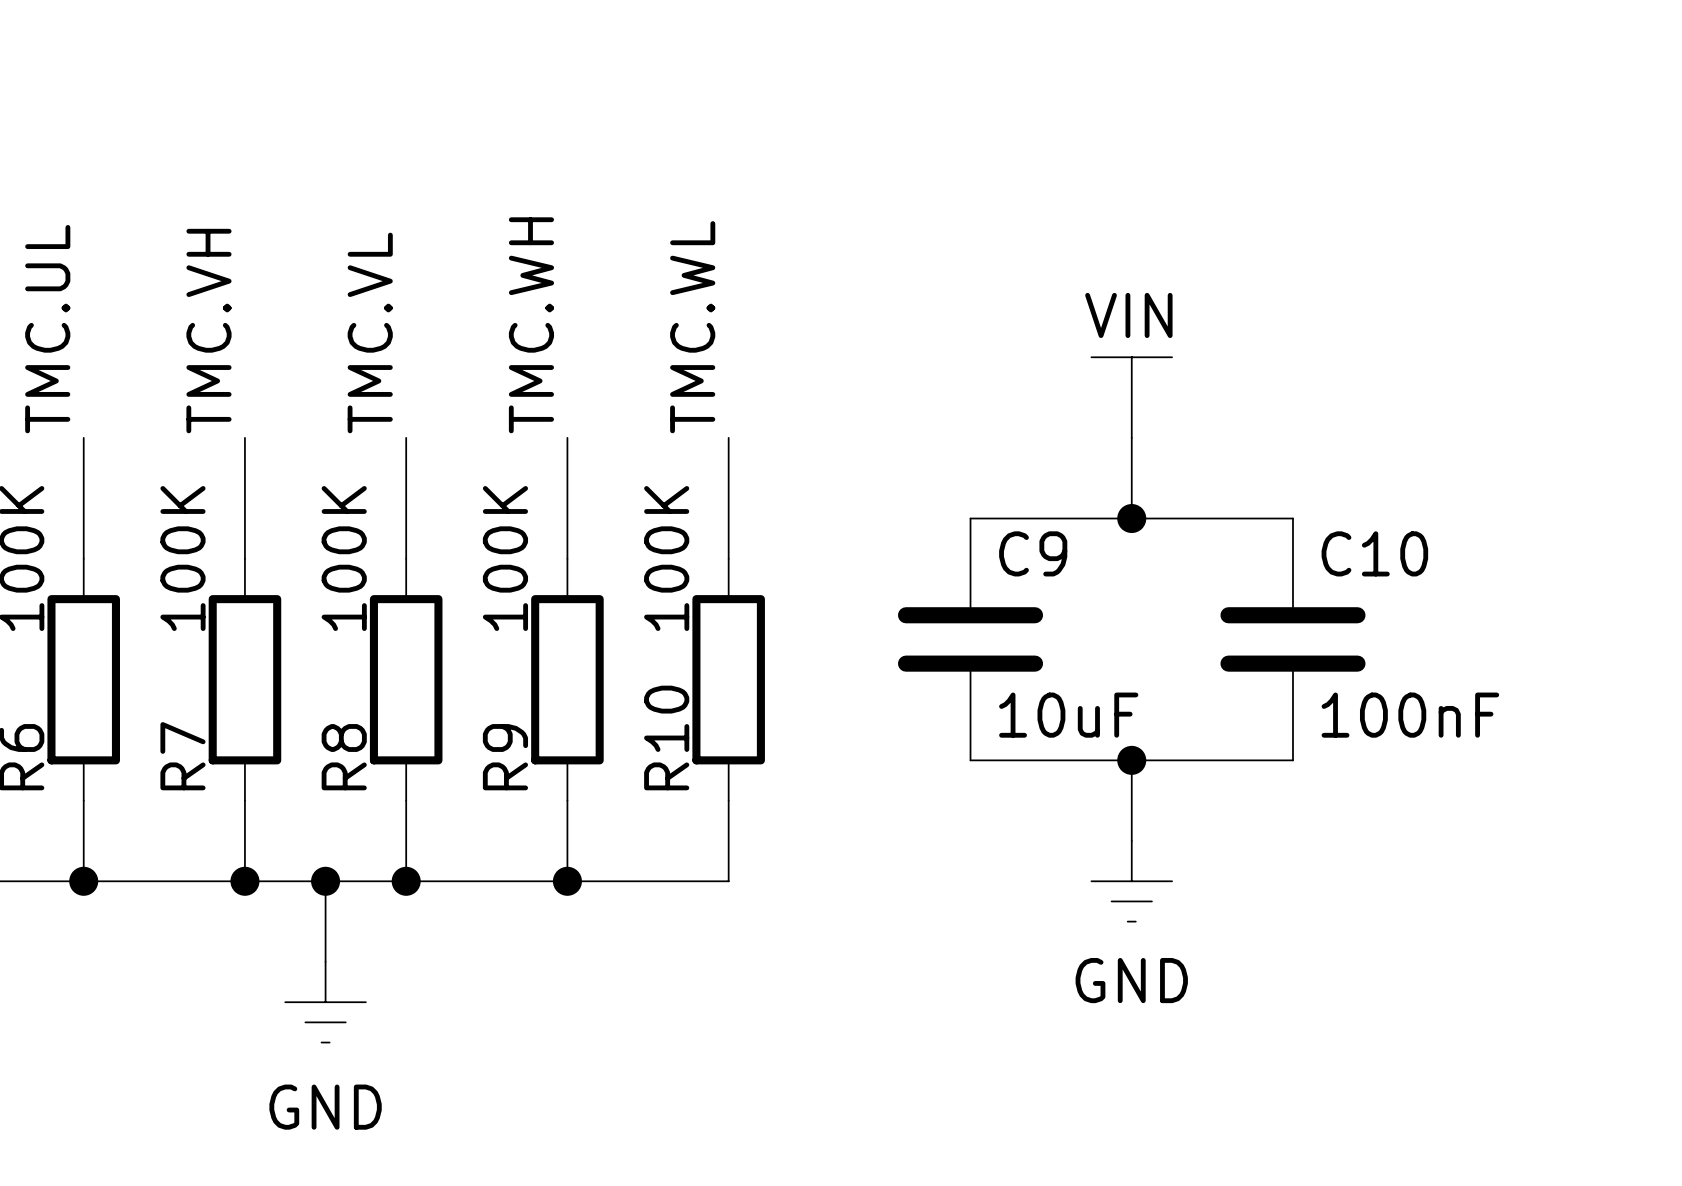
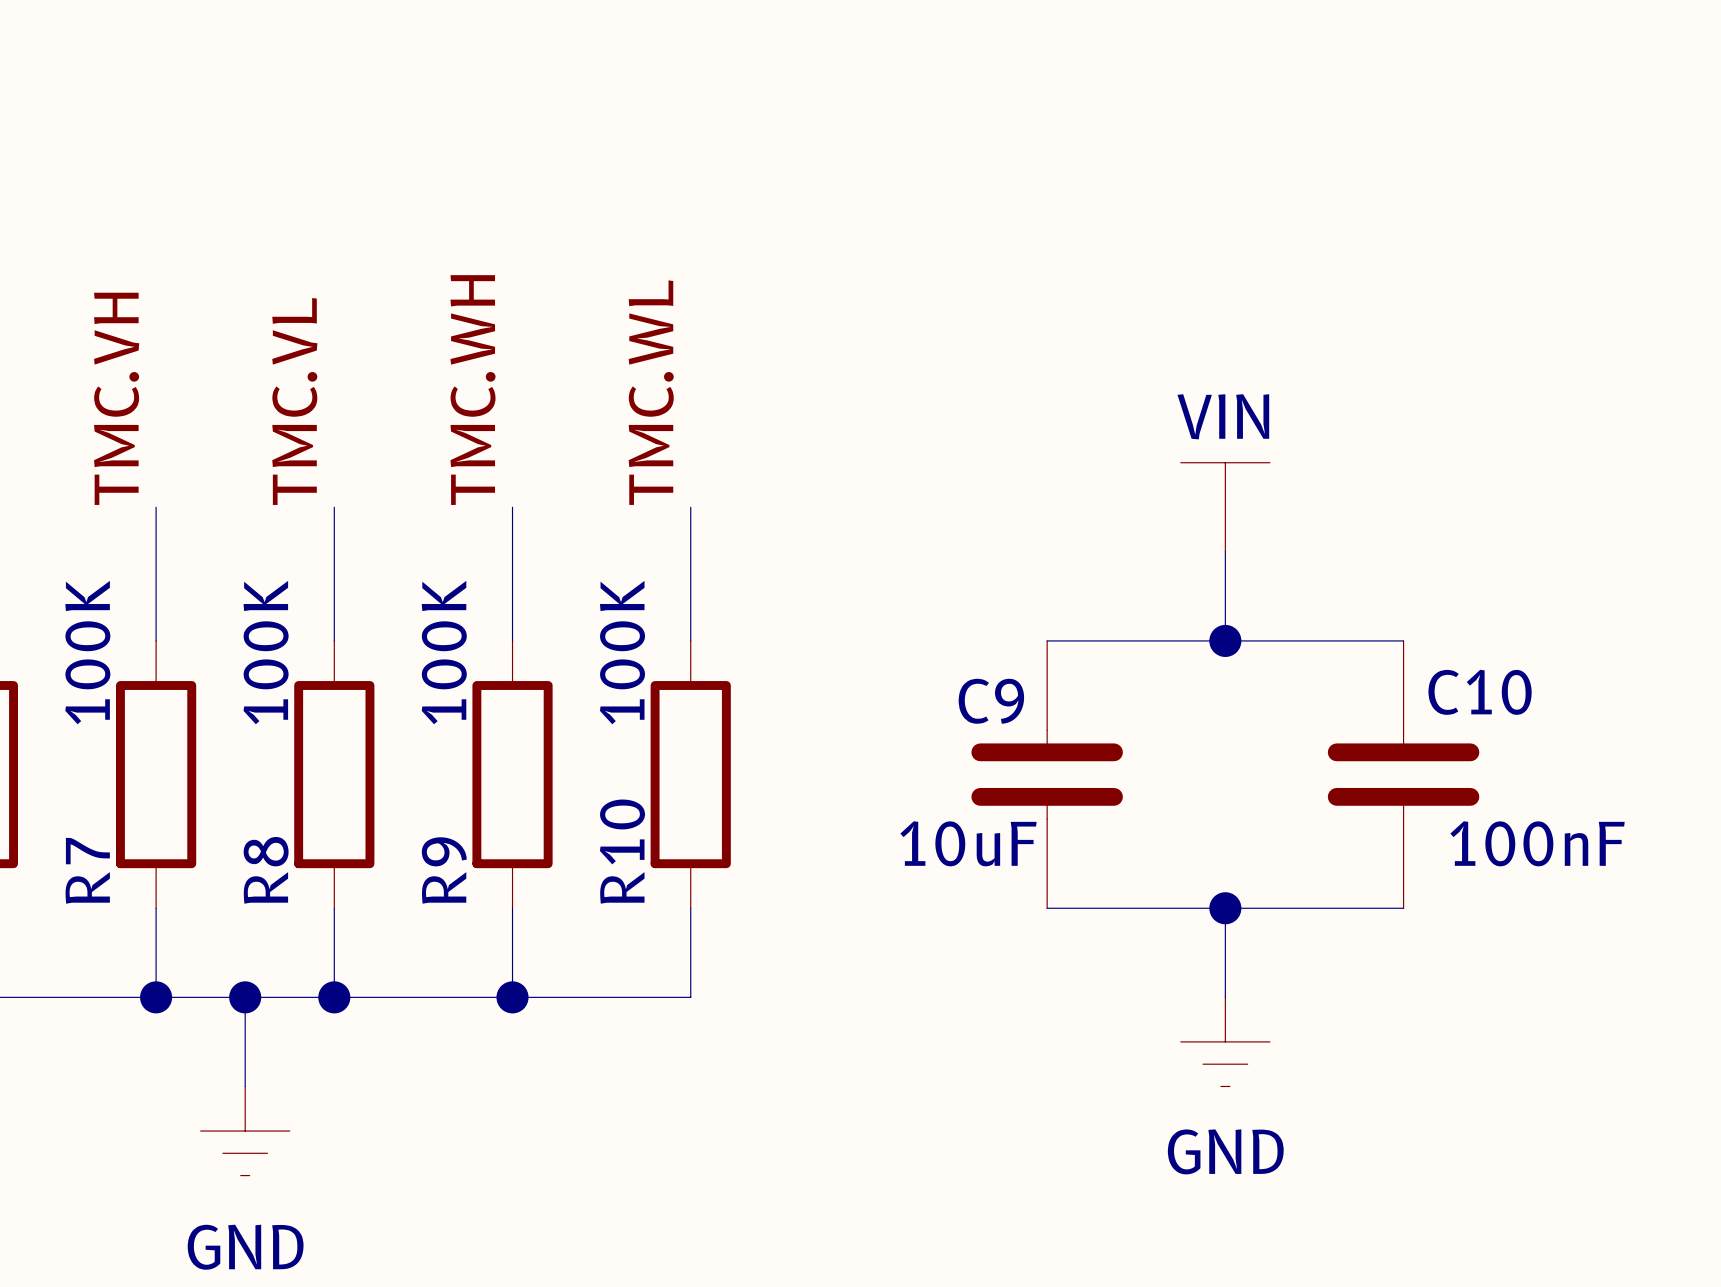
power symbol position: VIN (1131, 397) -> VIN (1225, 507)
wire: (1131, 437) (1131, 518) -> (1225, 551) (1225, 640)
C9 symbol: [897, 518, 1044, 761] -> [971, 640, 1123, 909]
wire: (970, 518) (1292, 518) -> (1047, 640) (1403, 640)
junction position: (1131, 518) -> (1225, 640)
C10 symbol: [1220, 518, 1366, 761] -> [1327, 640, 1480, 909]
C9 name position: C9 (1033, 553) -> C9 (991, 701)
C9 value position: 10uF (1068, 715) -> 10uF (968, 843)
wire: (970, 760) (1292, 760) -> (1047, 908) (1403, 908)
wire: (1131, 760) (1131, 840) -> (1225, 908) (1225, 997)
junction position: (1131, 760) -> (1225, 908)
power symbol position: GND (1131, 881) -> GND (1225, 1041)

